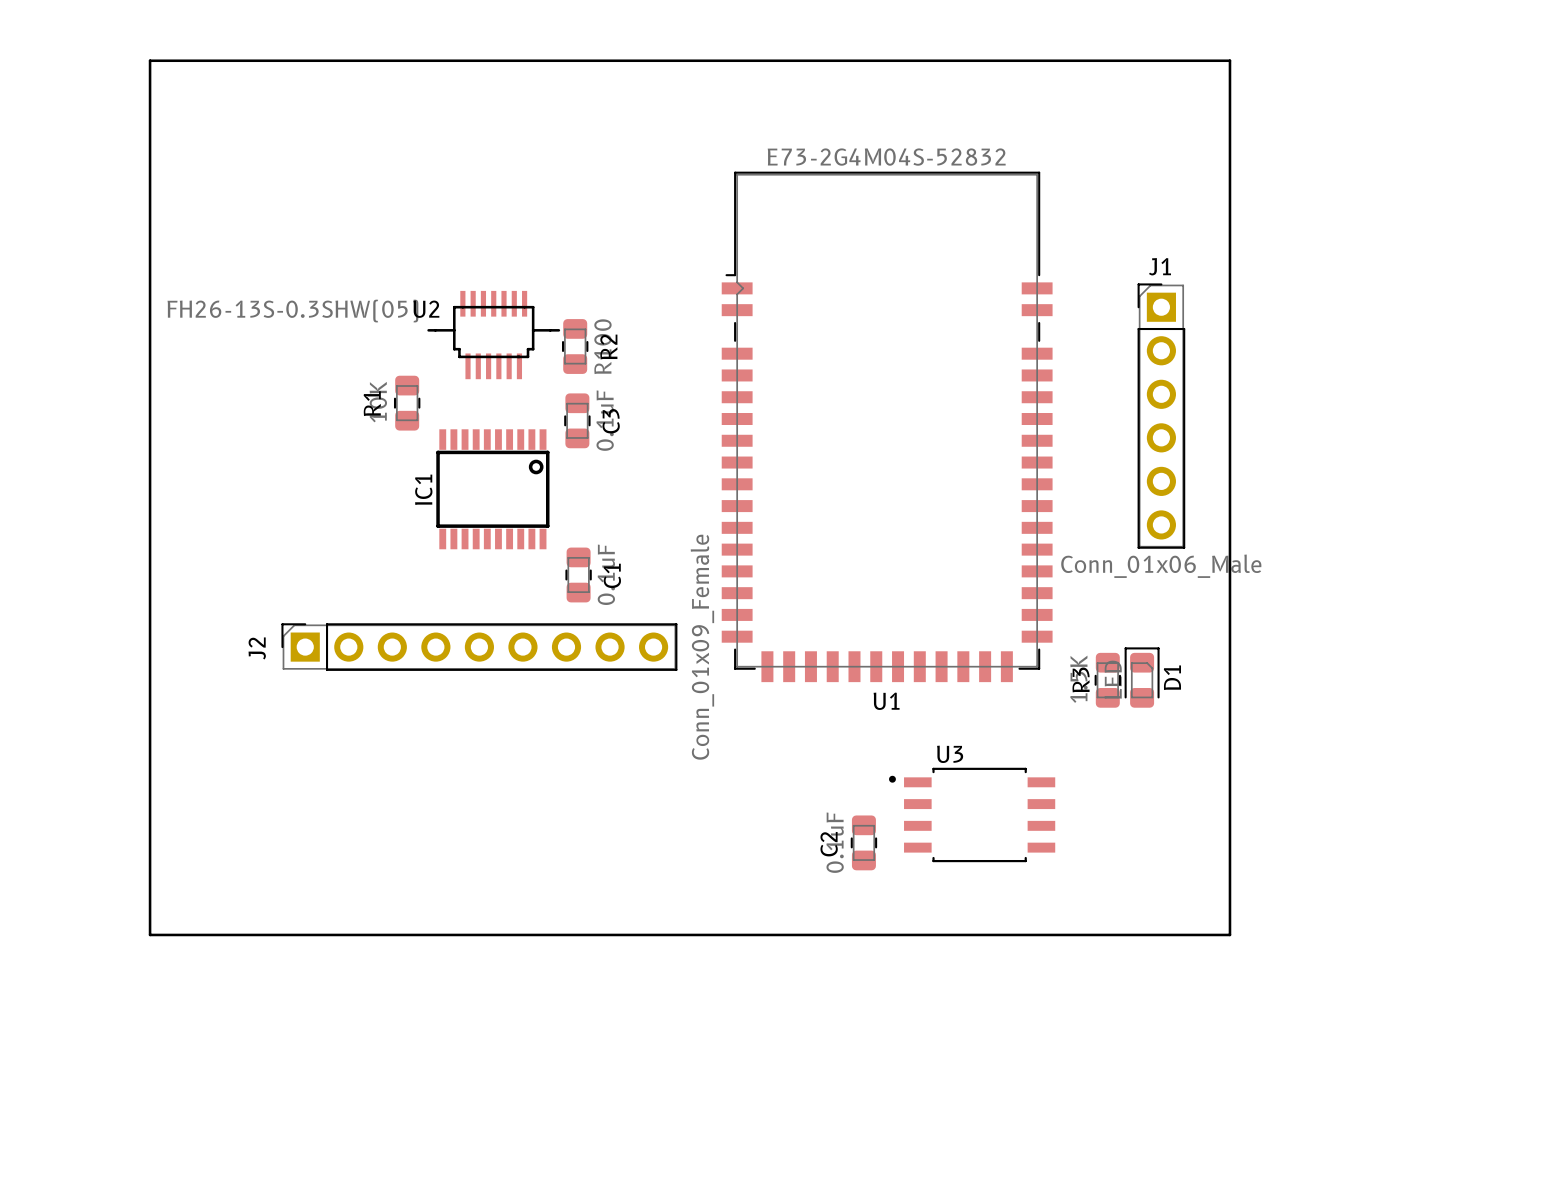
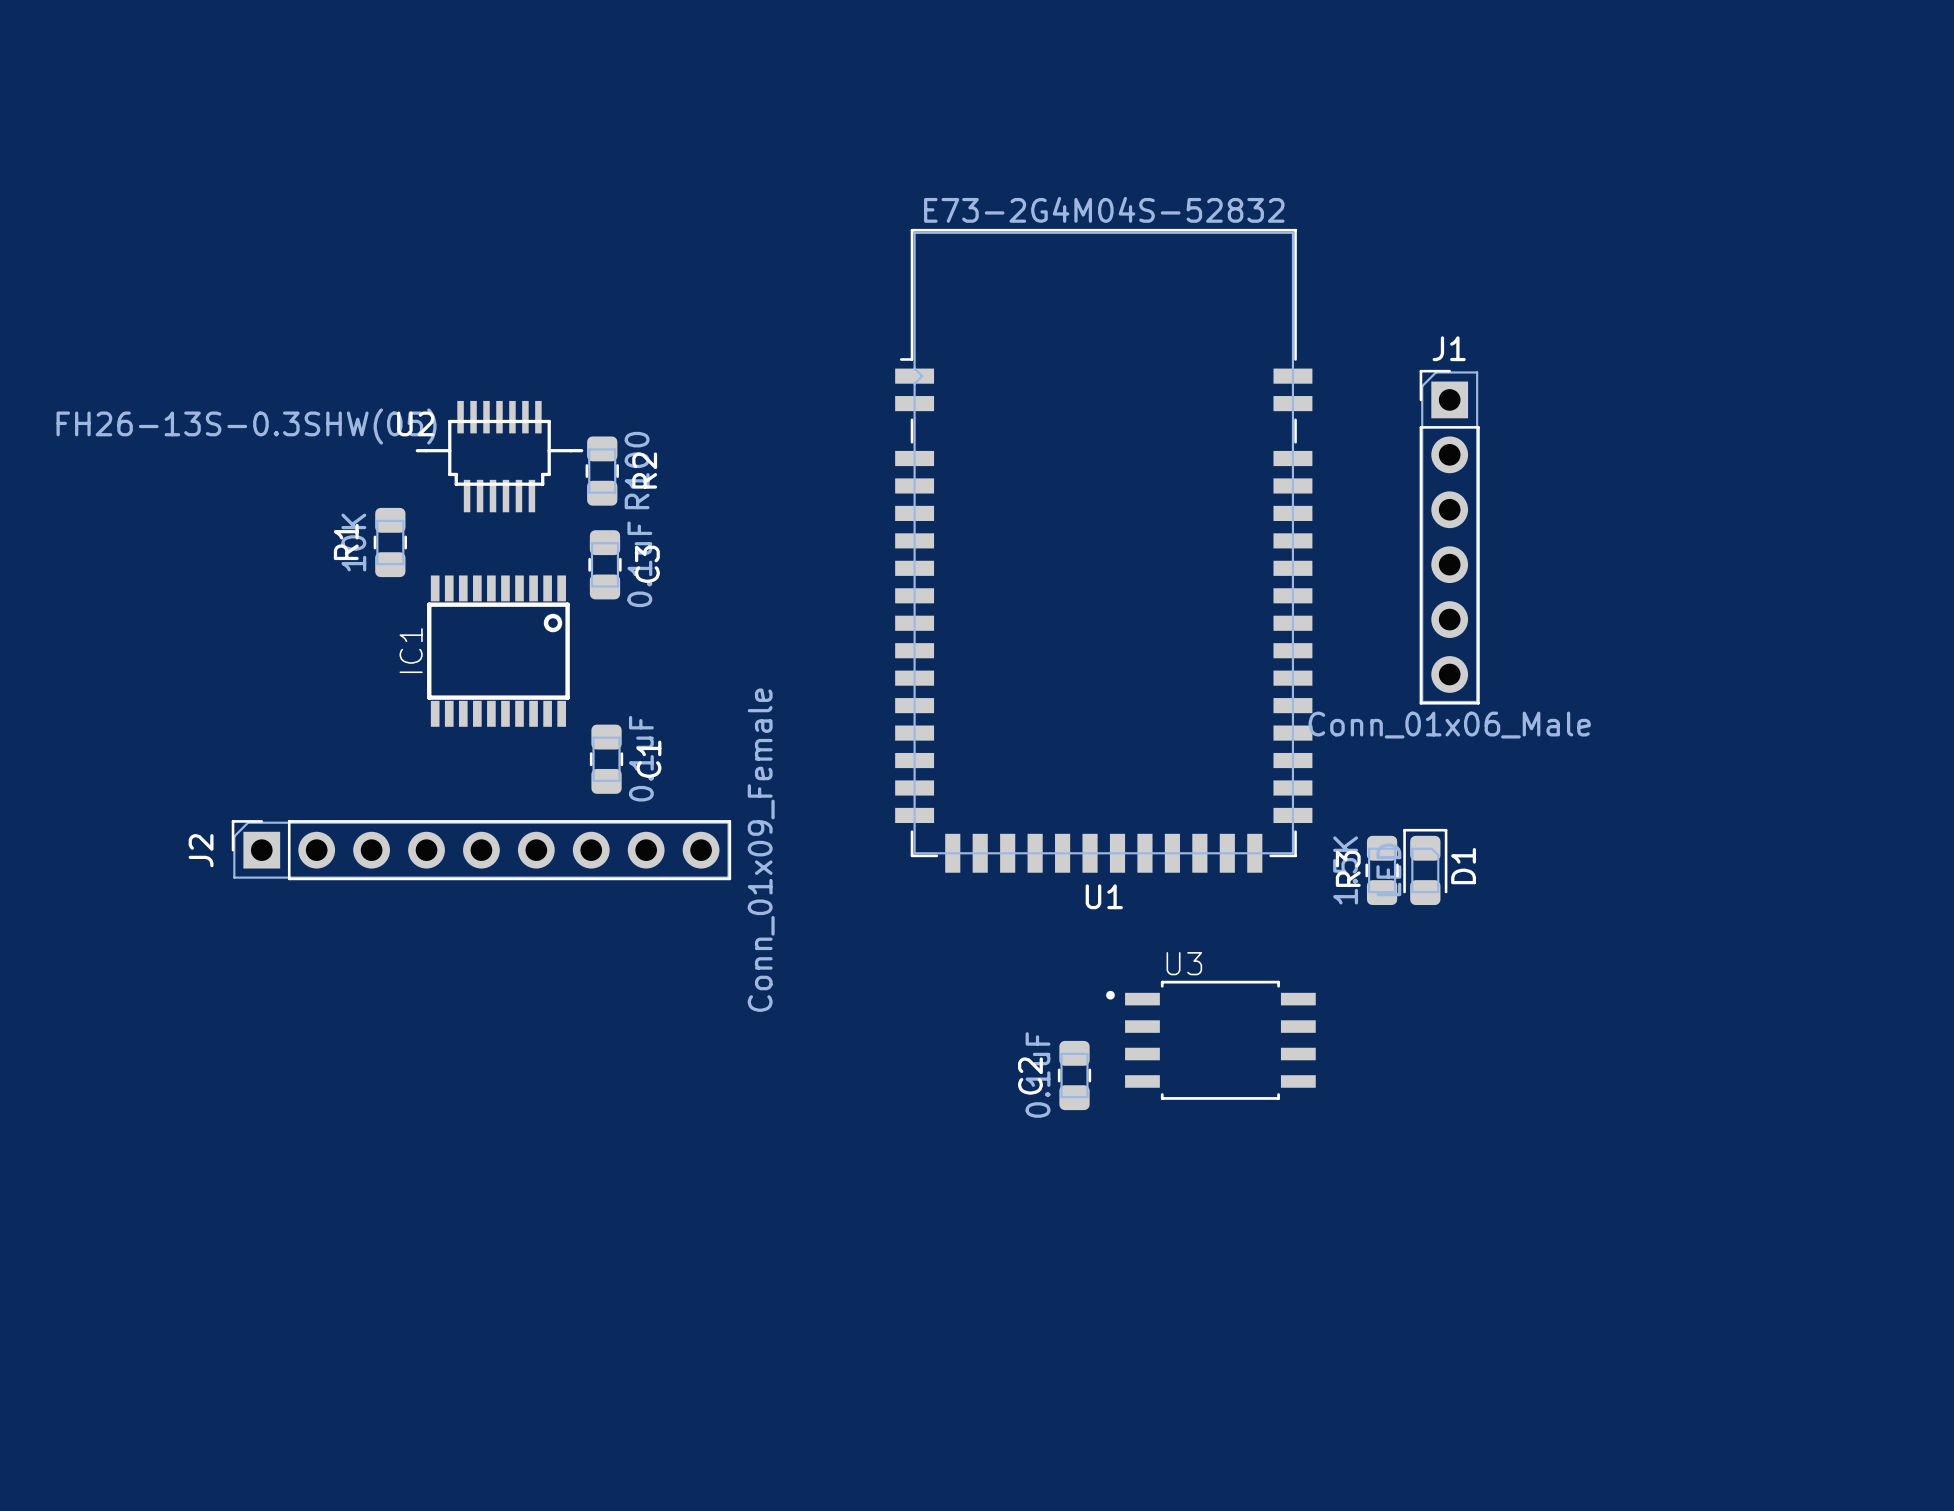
board edge: (150, 60) (1229, 60) (1229, 934) (150, 934) (150, 60) -> none
U2 position: (493, 335) -> (499, 456)
R2 position: (575, 346) -> (602, 471)
R1 position: (407, 403) -> (390, 542)
C3 position: (577, 420) -> (604, 564)
IC1 position: (492, 489) -> (498, 651)
C1 position: (578, 574) -> (606, 759)
J2 position: (479, 647) -> (481, 850)

